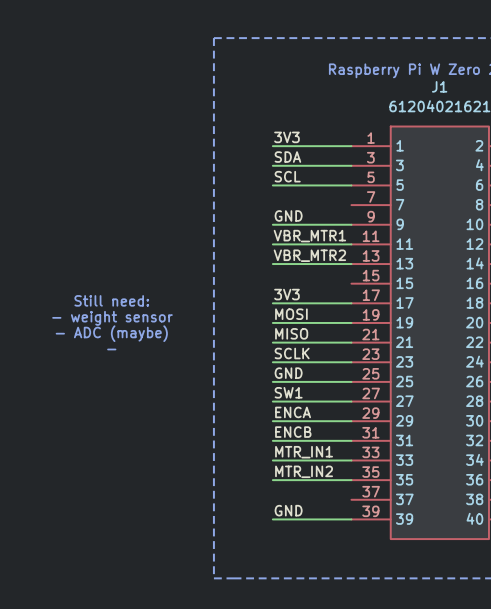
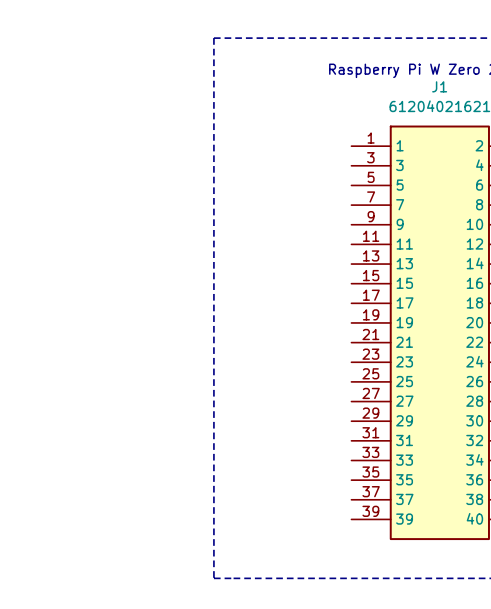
label: 3V3 (286, 137) -> none
wire: (272, 146) (351, 146) -> none
label: SDA (287, 157) -> none
wire: (272, 165) (351, 165) -> none
label: SCL (287, 176) -> none
wire: (272, 185) (351, 185) -> none
label: GND (288, 215) -> none
wire: (272, 224) (351, 224) -> none
label: VBR_MTR1 (309, 236) -> none
wire: (272, 244) (351, 244) -> none
label: VBR_MTR2 (309, 255) -> none
wire: (272, 264) (351, 264) -> none
label: 3V3 (286, 294) -> none
text: Still need: (111, 300) -> none
wire: (272, 303) (351, 303) -> none
label: MOSI (291, 314) -> none
text: - weight sensor (112, 318) -> none
wire: (272, 322) (351, 322) -> none
text: - ADC (maybe) (111, 333) -> none
label: MISO (291, 333) -> none
wire: (272, 342) (351, 342) -> none
text: - (111, 349) -> none
label: SCLK (292, 353) -> none
wire: (272, 362) (351, 362) -> none
label: GND (288, 373) -> none
wire: (272, 381) (351, 381) -> none
label: SW1 (288, 392) -> none
wire: (272, 401) (351, 401) -> none
label: ENCA (293, 412) -> none
wire: (272, 421) (351, 421) -> none
label: ENCB (293, 432) -> none
wire: (272, 440) (351, 440) -> none
label: MTR_IN1 (304, 452) -> none
wire: (272, 460) (351, 460) -> none
label: MTR_IN2 (304, 471) -> none
wire: (272, 480) (351, 480) -> none
label: GND (288, 510) -> none
wire: (272, 519) (351, 519) -> none

